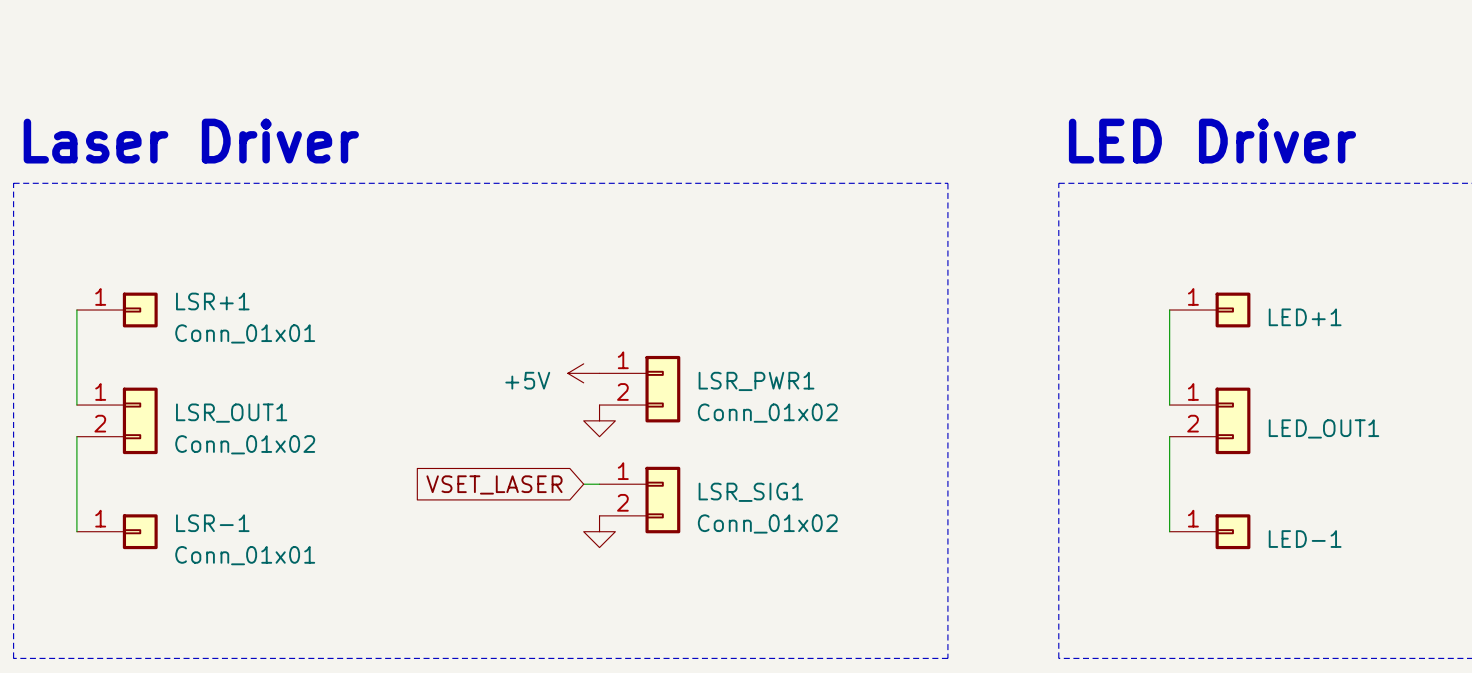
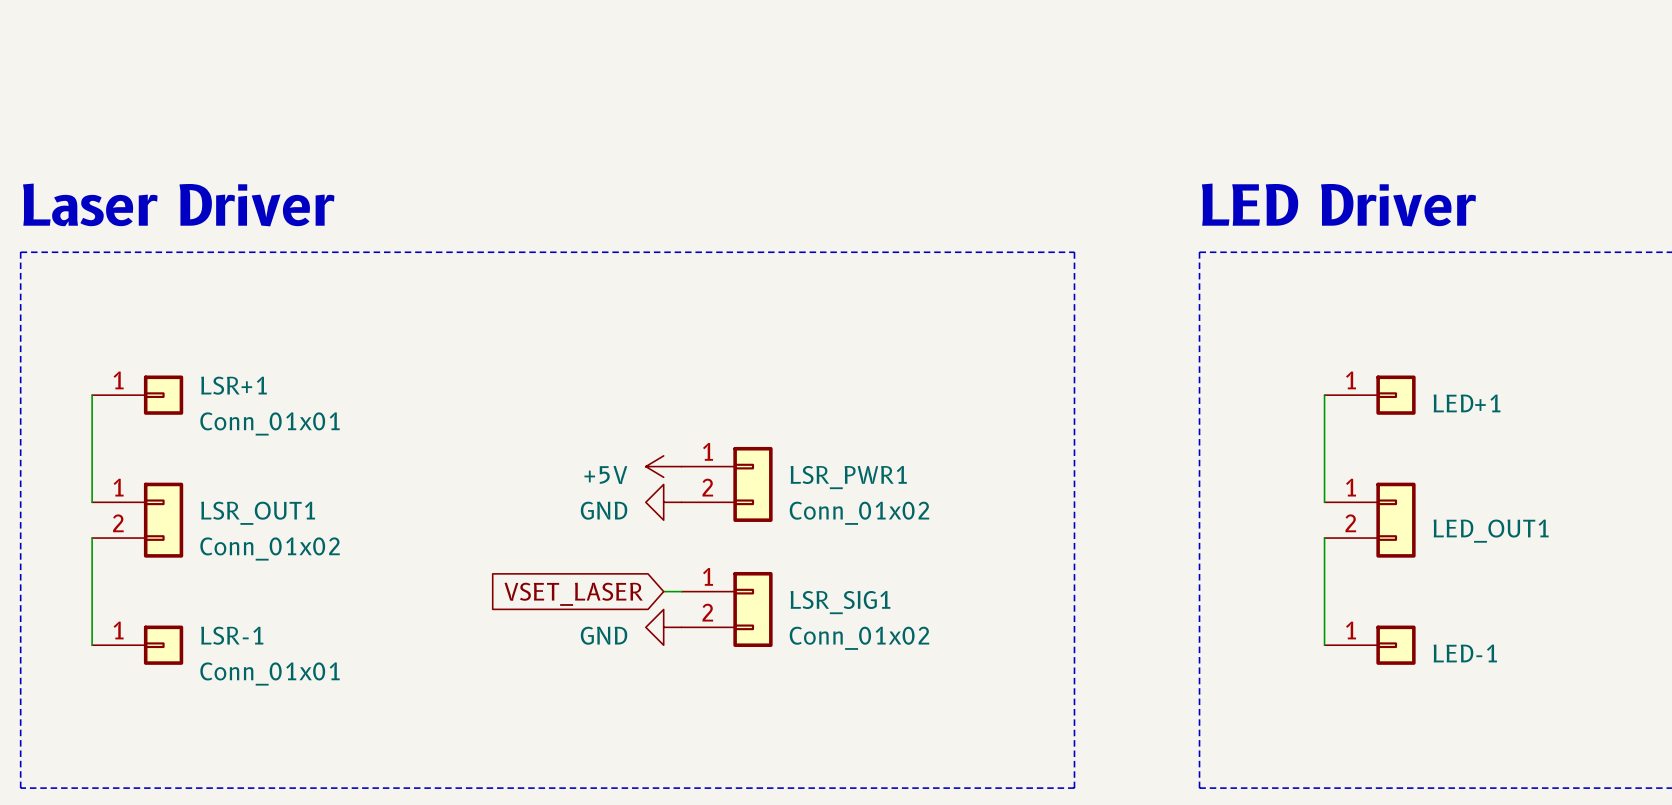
power symbol: none -> GND (663, 502)
power symbol: (599, 420) -> none
power symbol: none -> GND (663, 627)
power symbol: (599, 531) -> none

